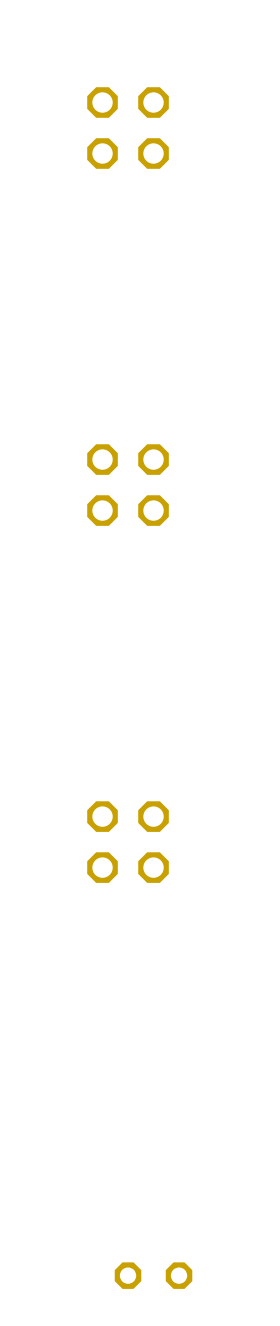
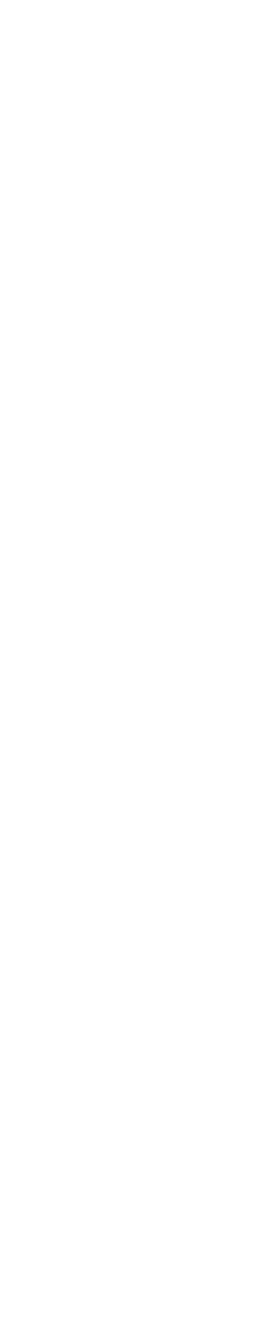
part: (128, 128) -> none
part: (128, 485) -> none
part: (128, 842) -> none
part: (153, 1275) -> none

